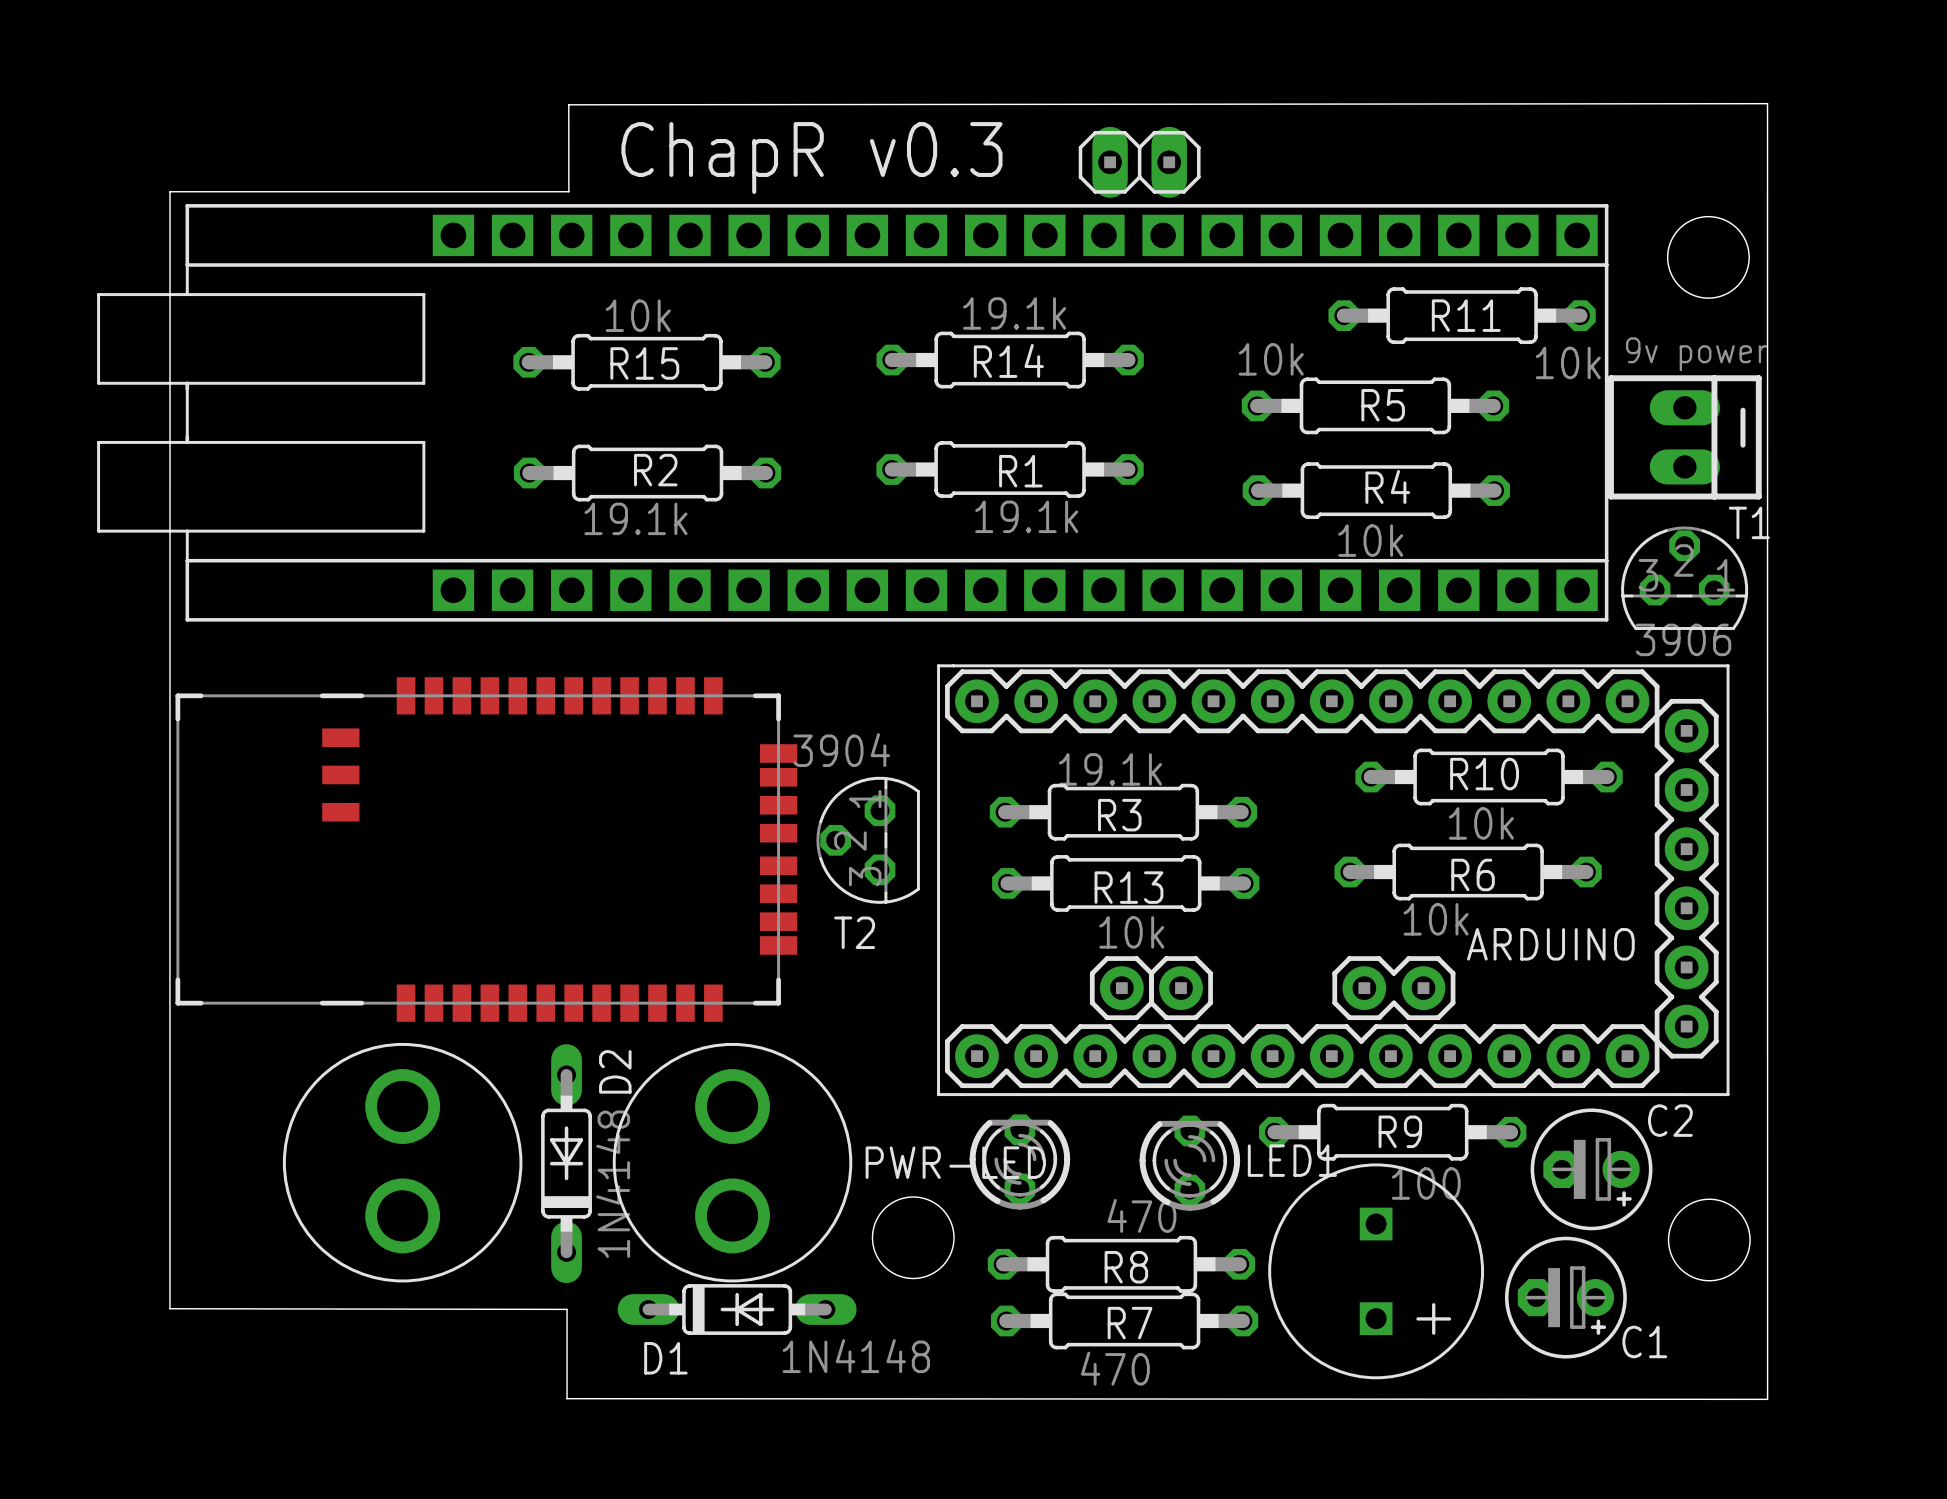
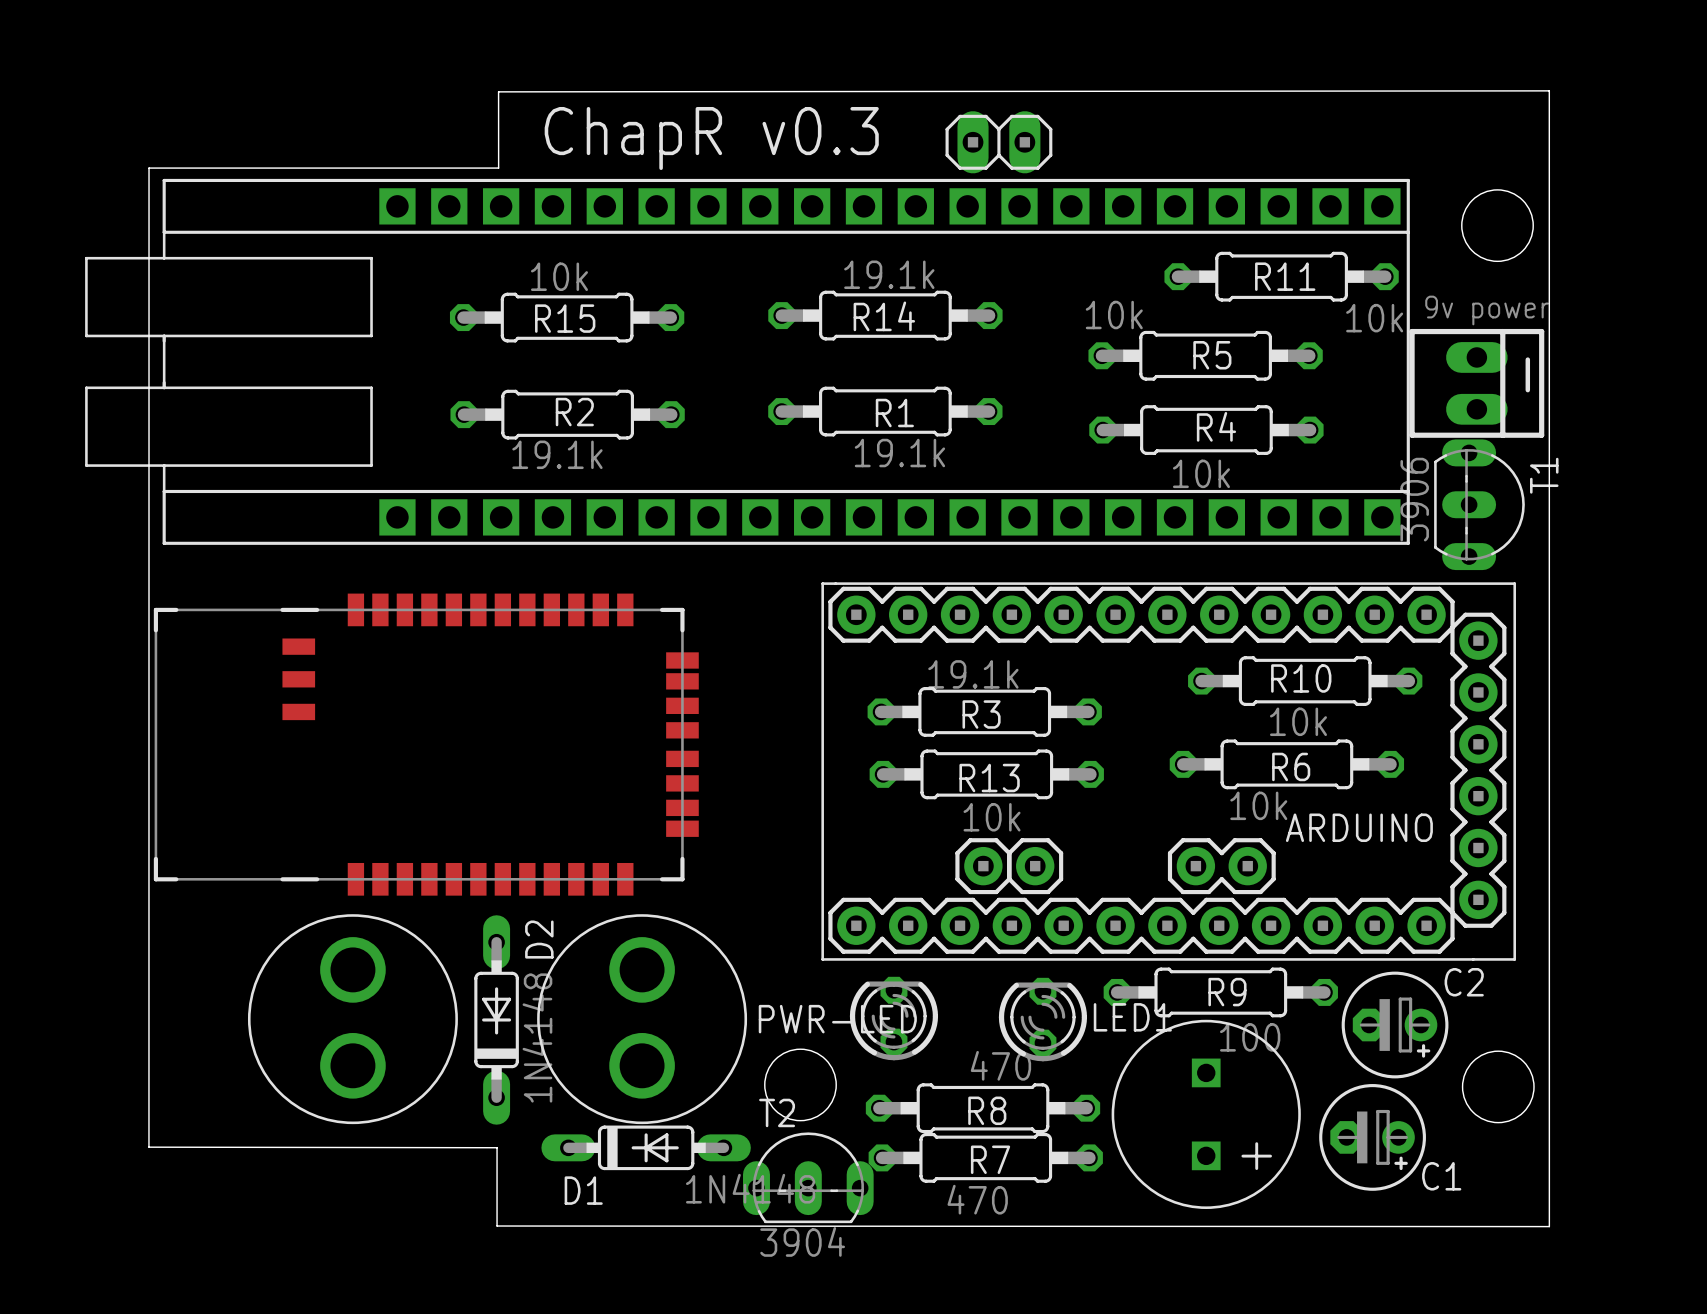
T1 footprint: [1621, 526, 1749, 630] -> [1434, 439, 1525, 571]
T1 value position: 3906 (1683, 639) -> 3906 (1414, 499)
T2 value position: 3904 (841, 750) -> 3904 (802, 1241)
T2 footprint: [816, 776, 920, 904] -> [743, 1132, 874, 1224]
T2 name position: T2 (854, 932) -> T2 (777, 1112)

